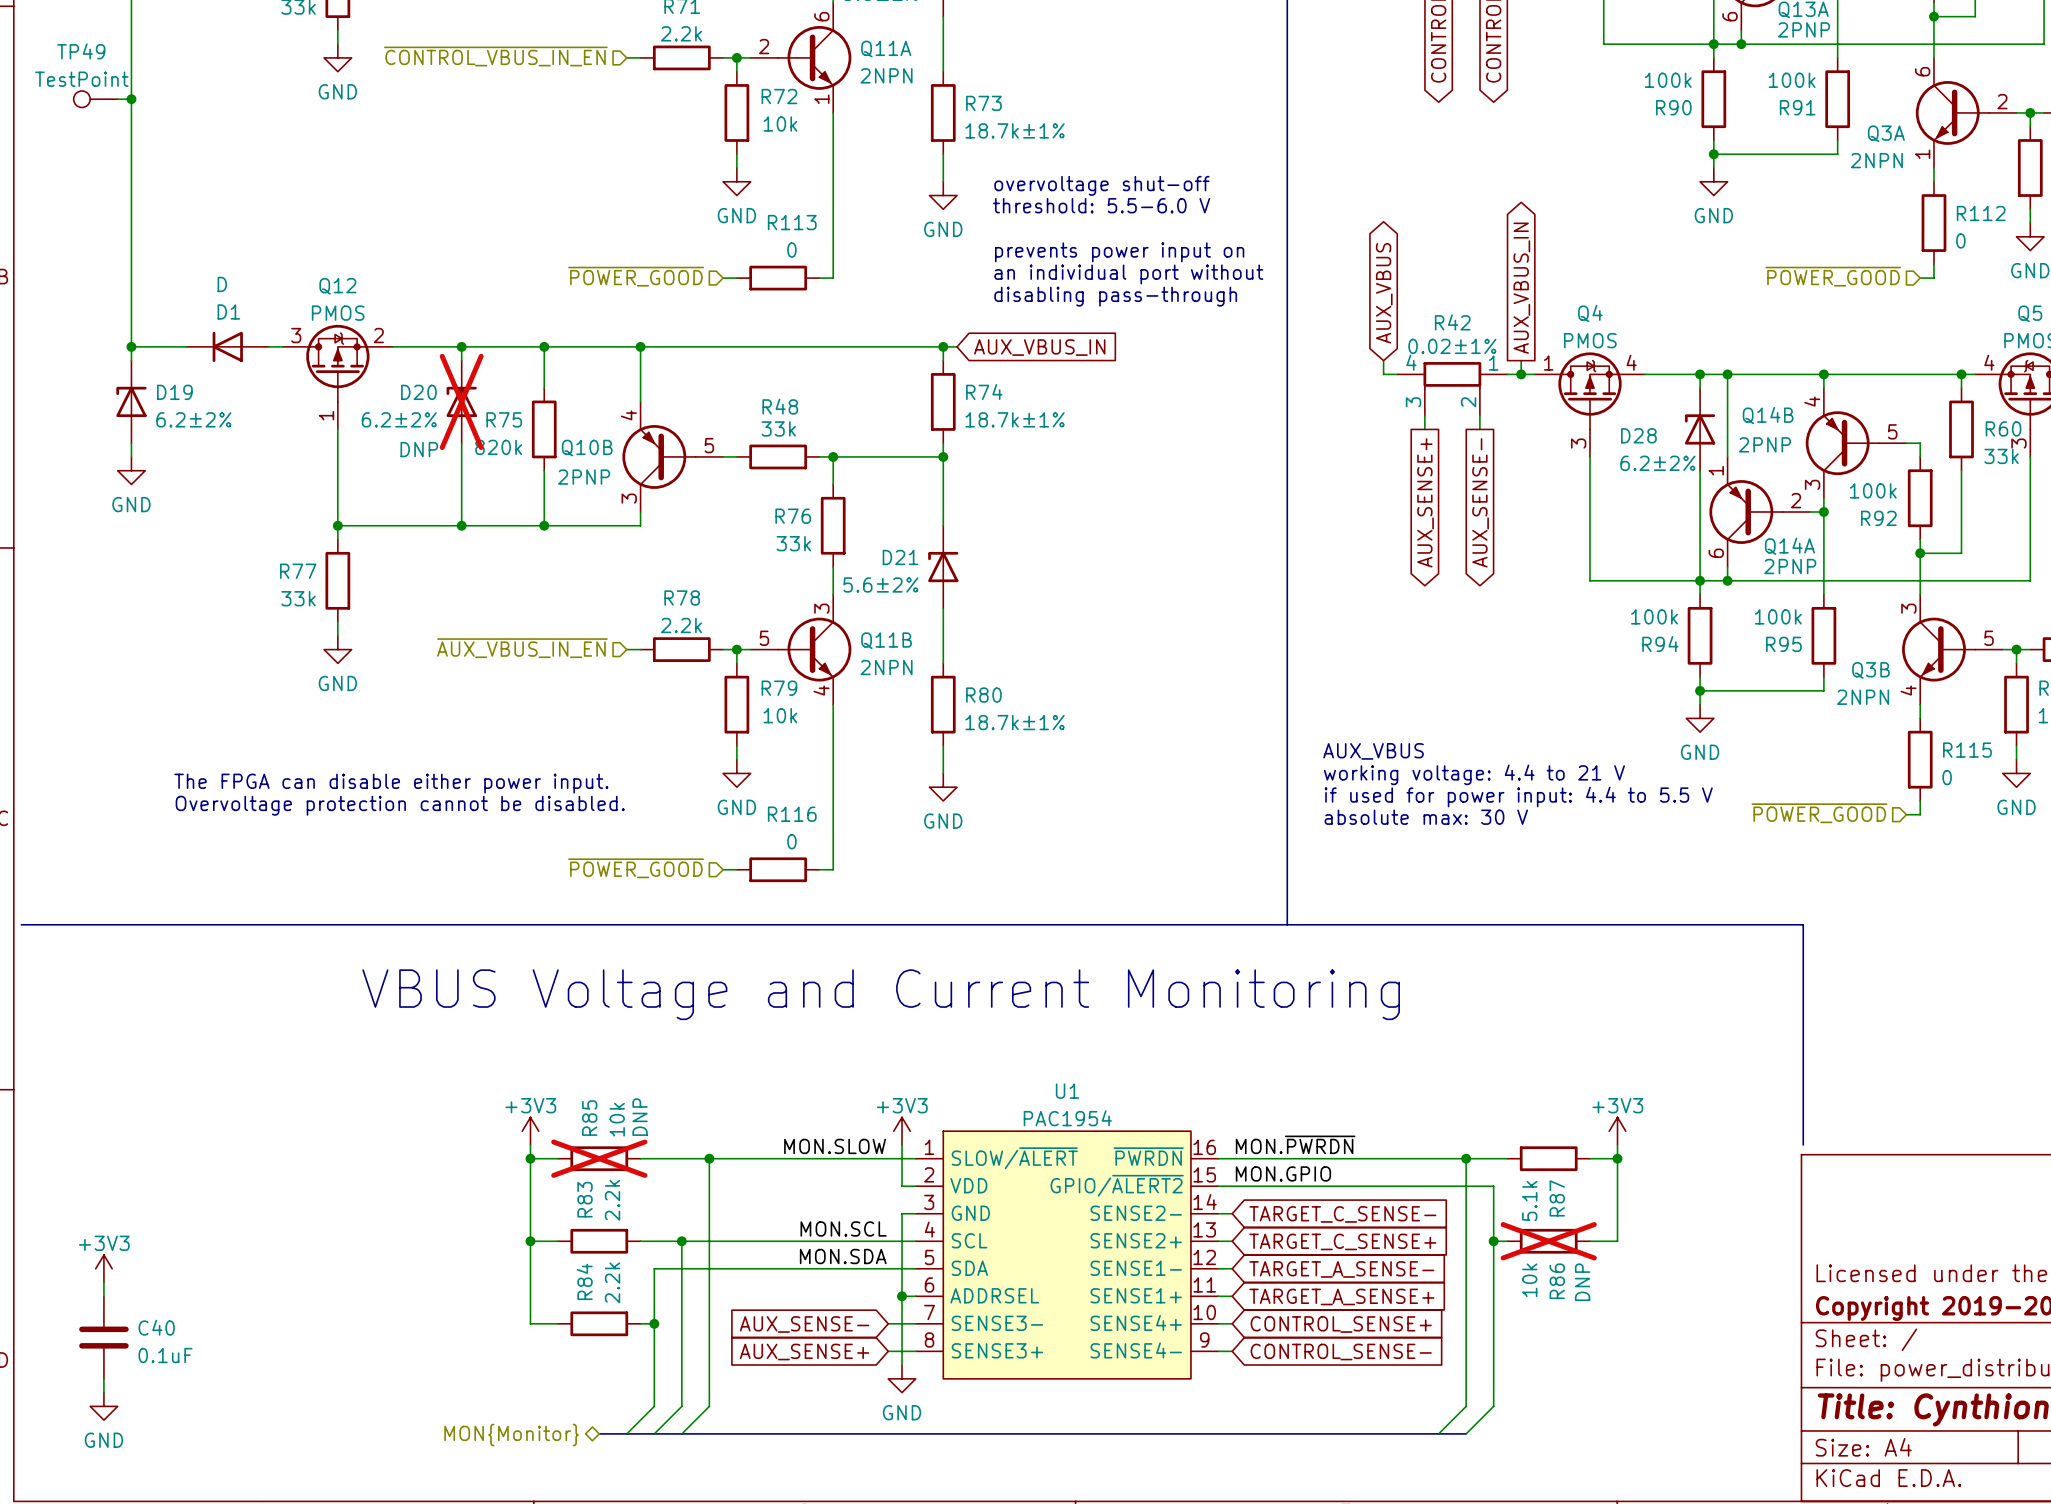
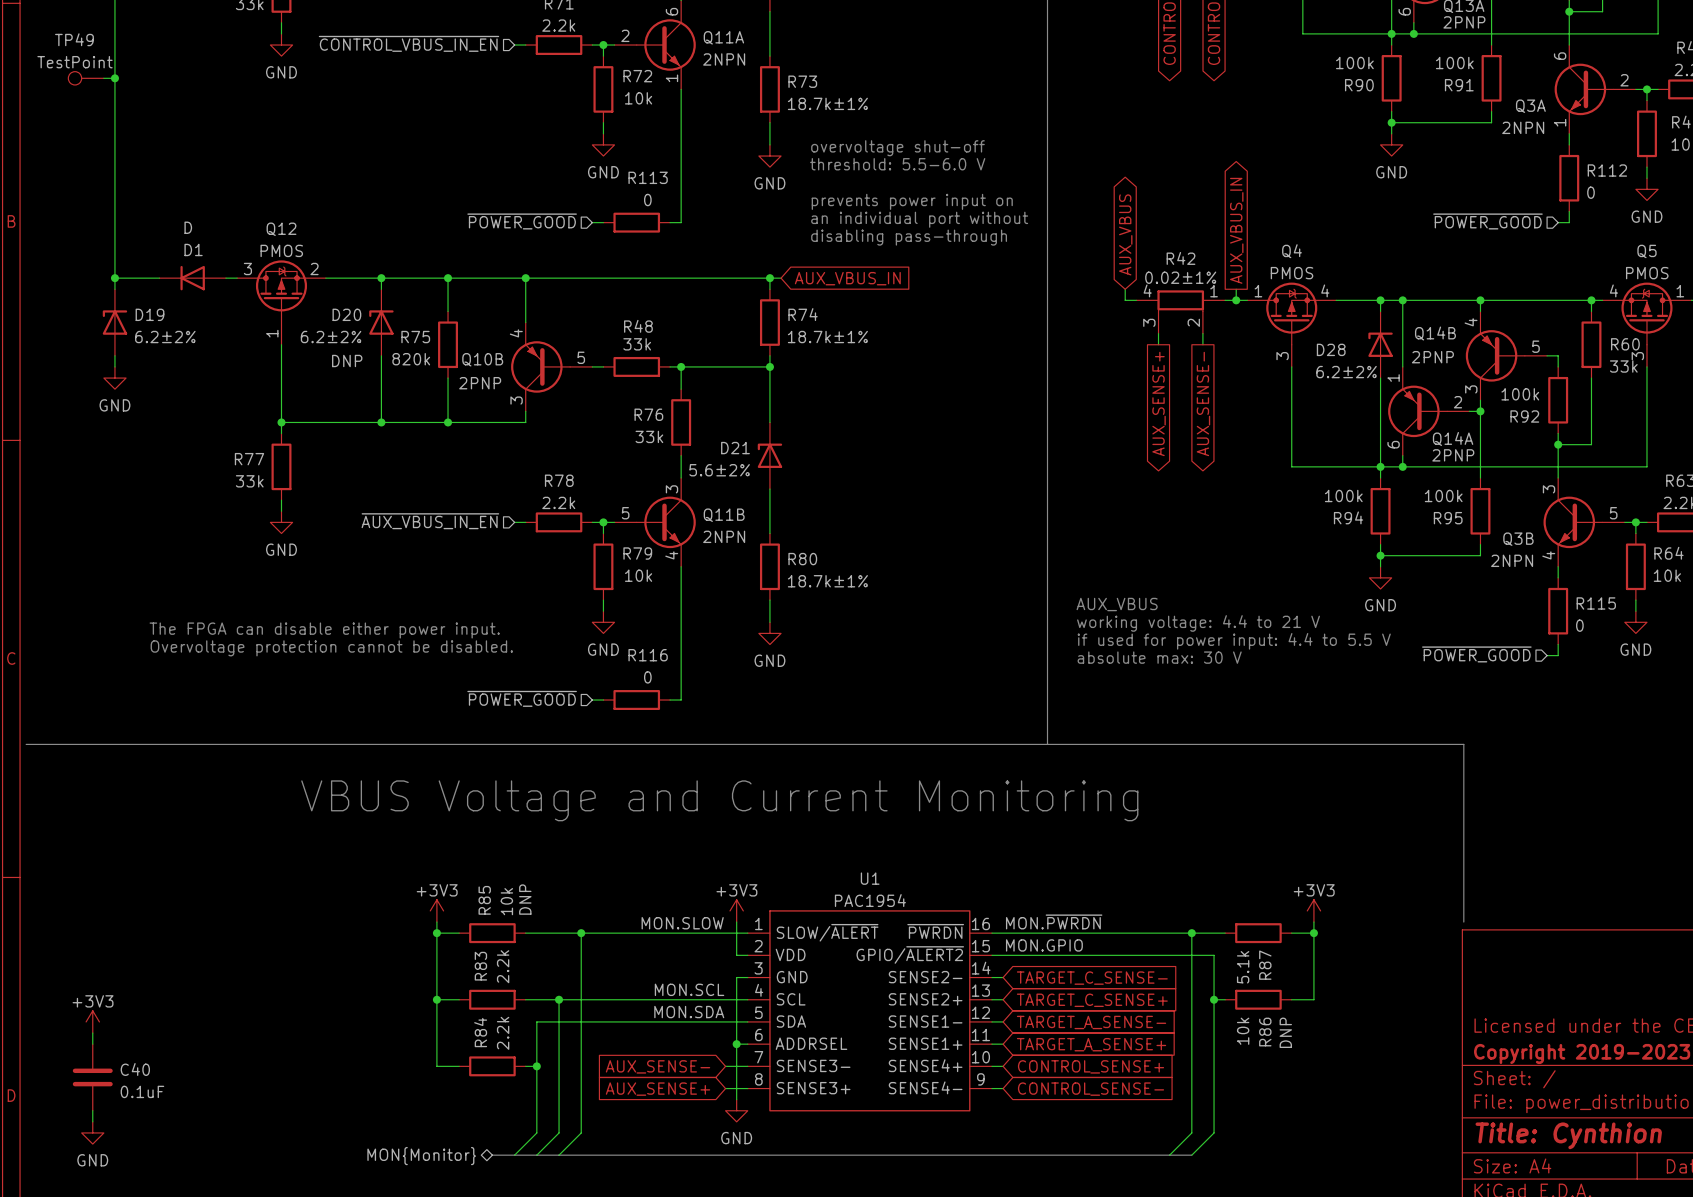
D20 do-not-place cross: (461, 401) -> none
R85 do-not-place cross: (599, 1158) -> none
R86 do-not-place cross: (1548, 1241) -> none

